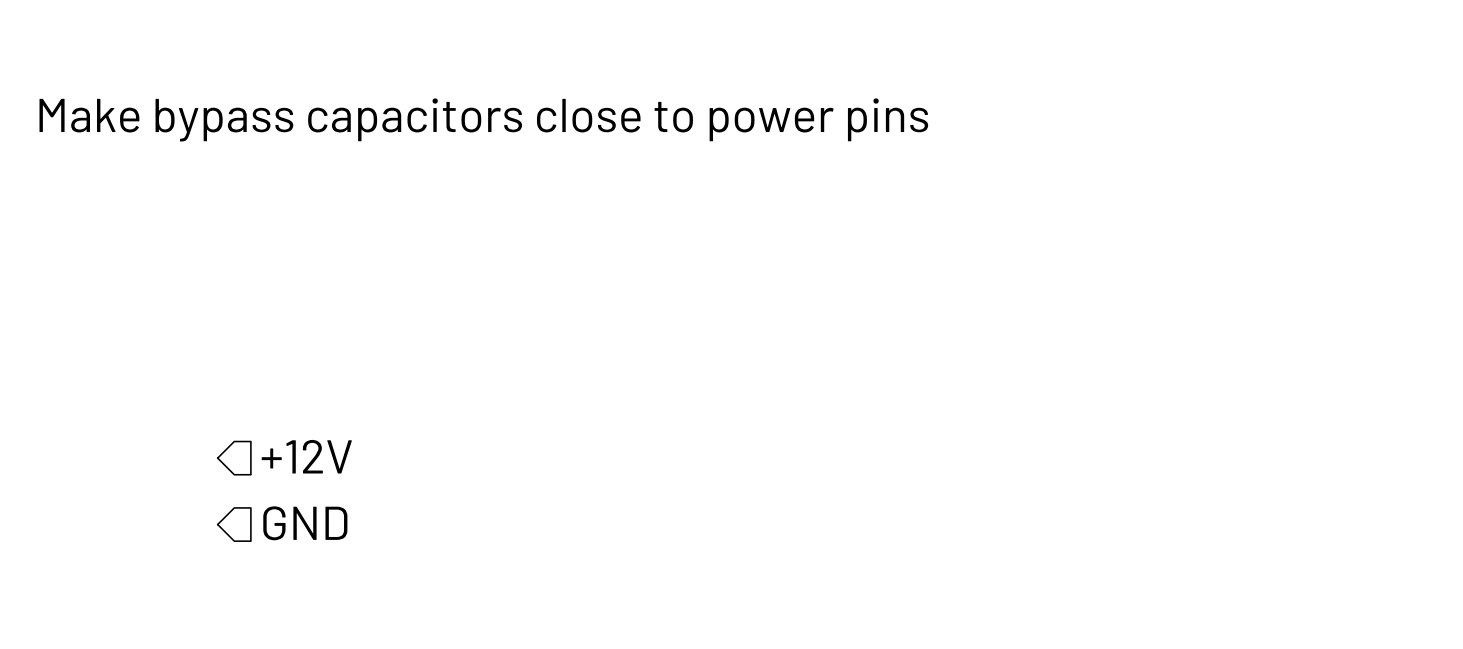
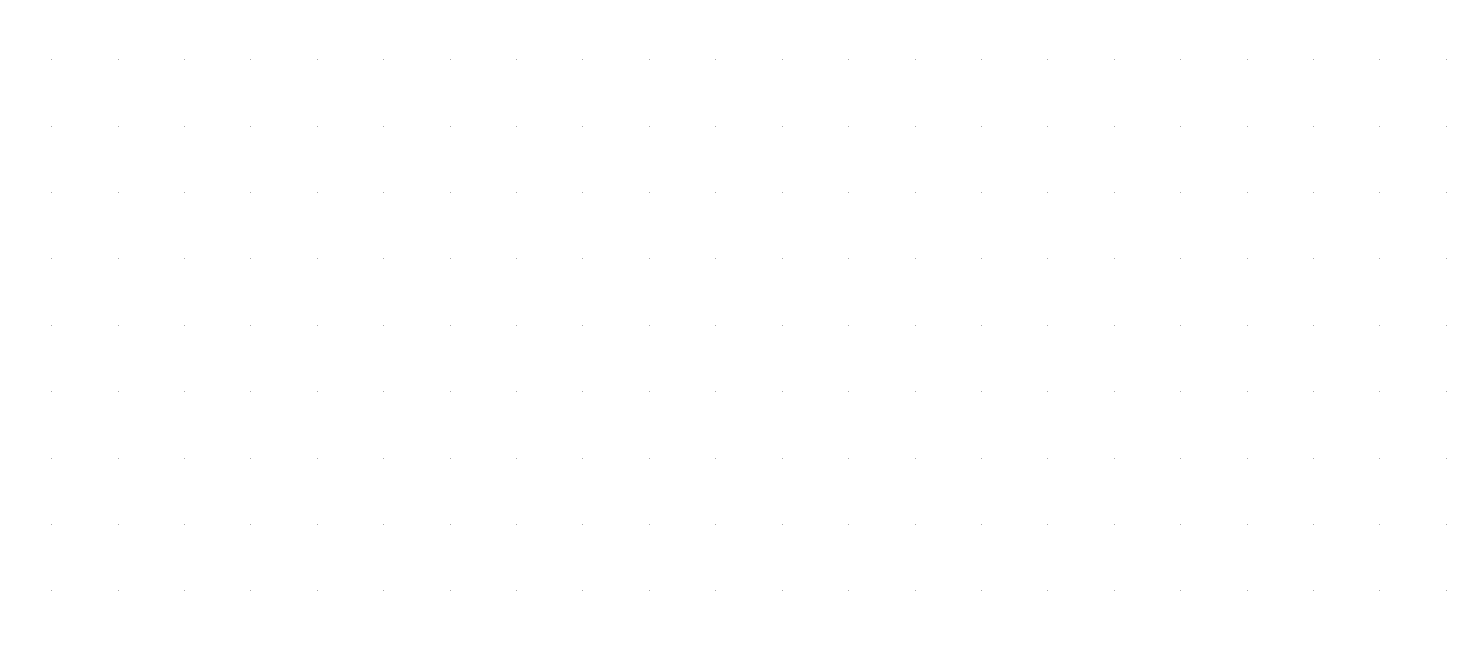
text: Make bypass capacitors close to power pins (483, 119) -> none
hierarchical label: +12V (306, 456) -> none
hierarchical label: GND (305, 523) -> none

